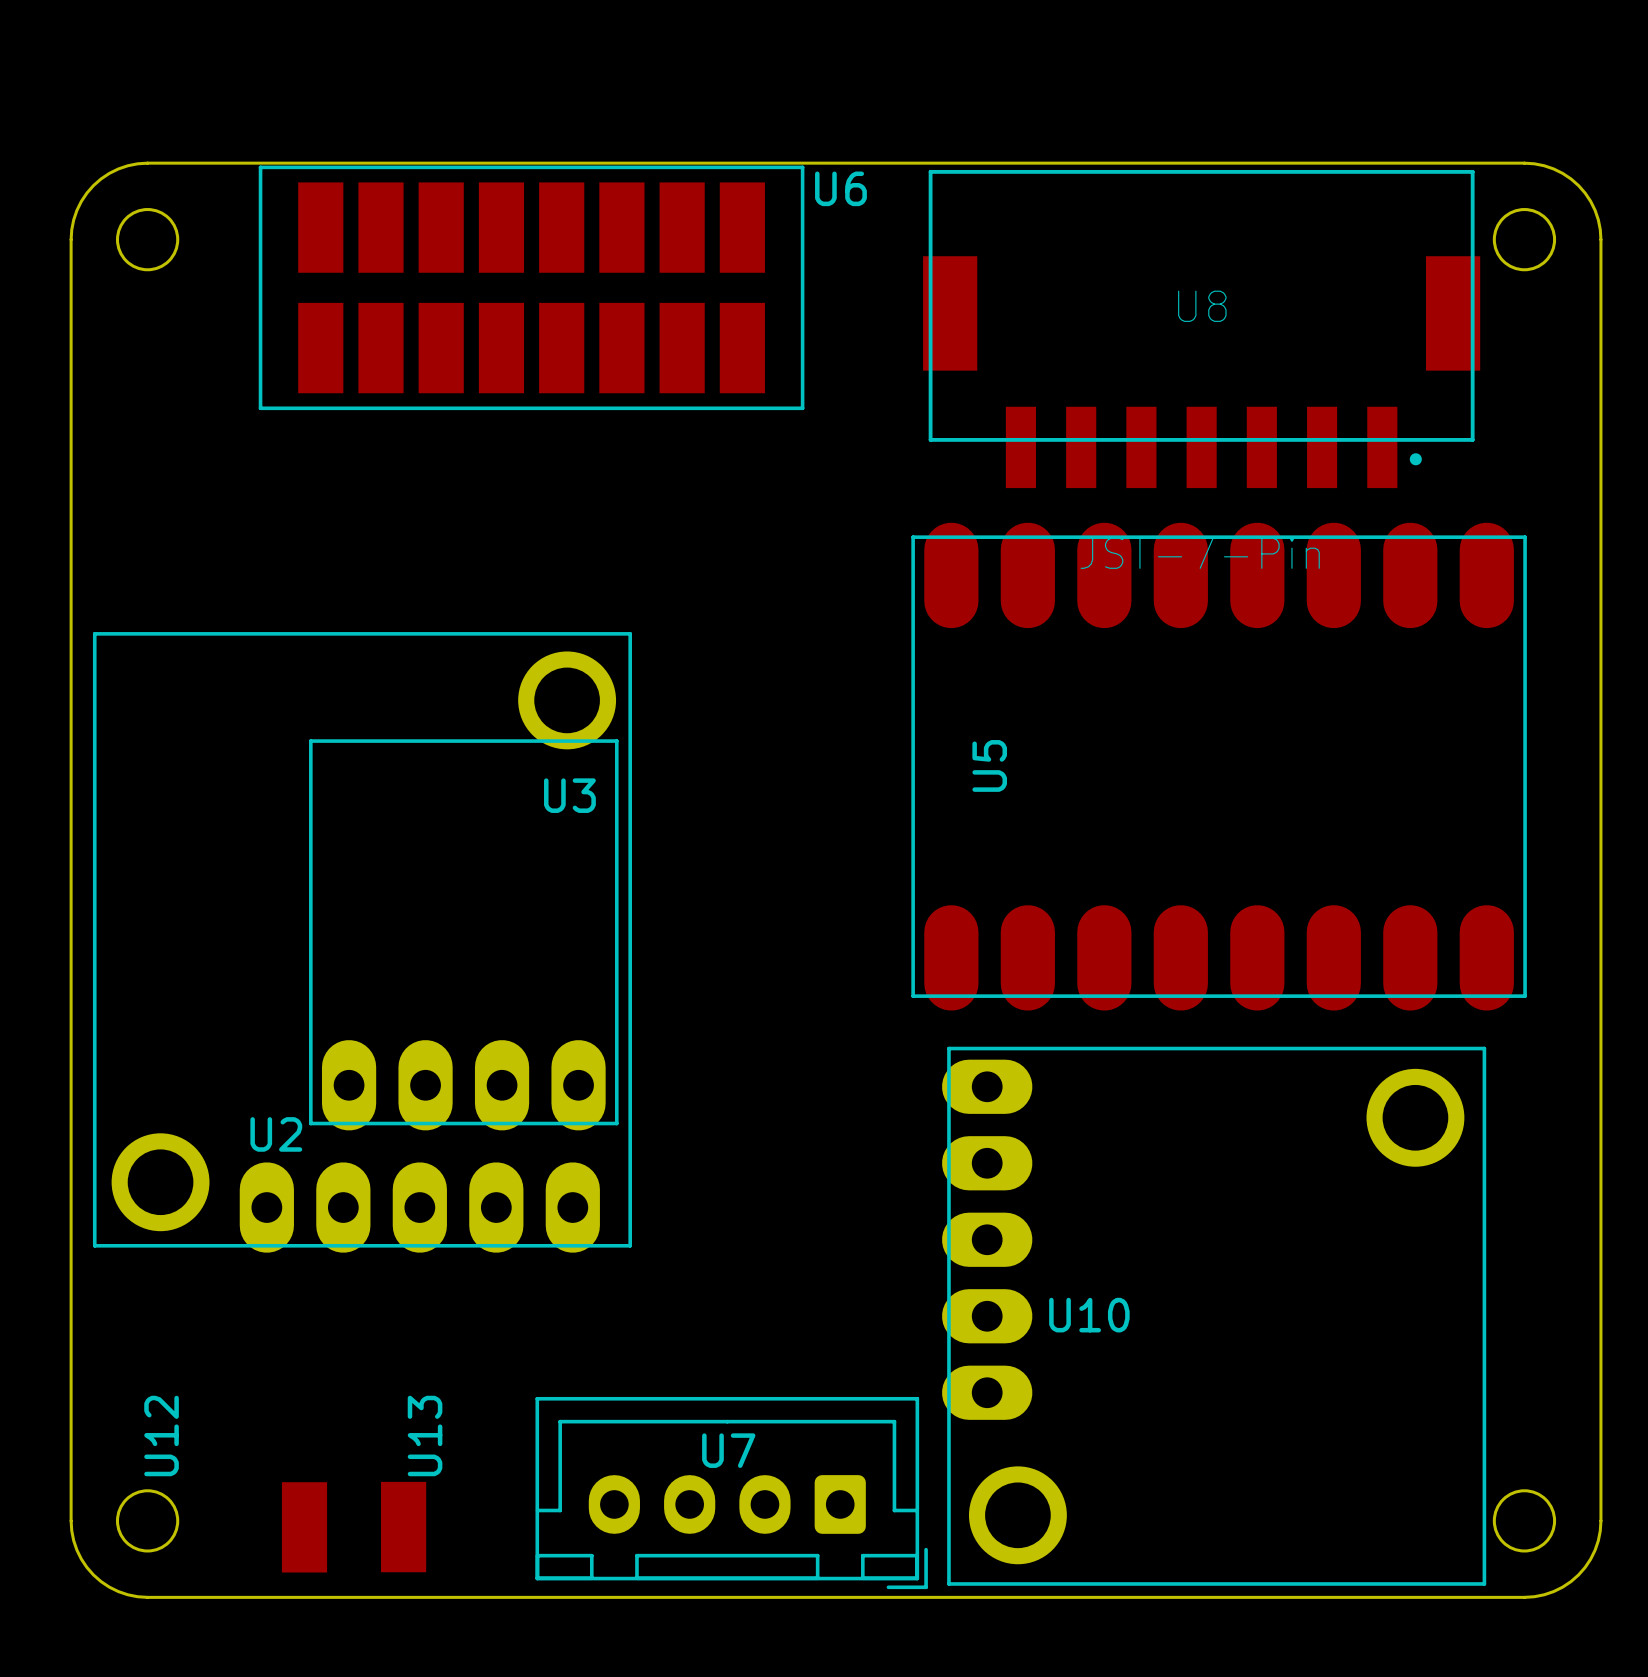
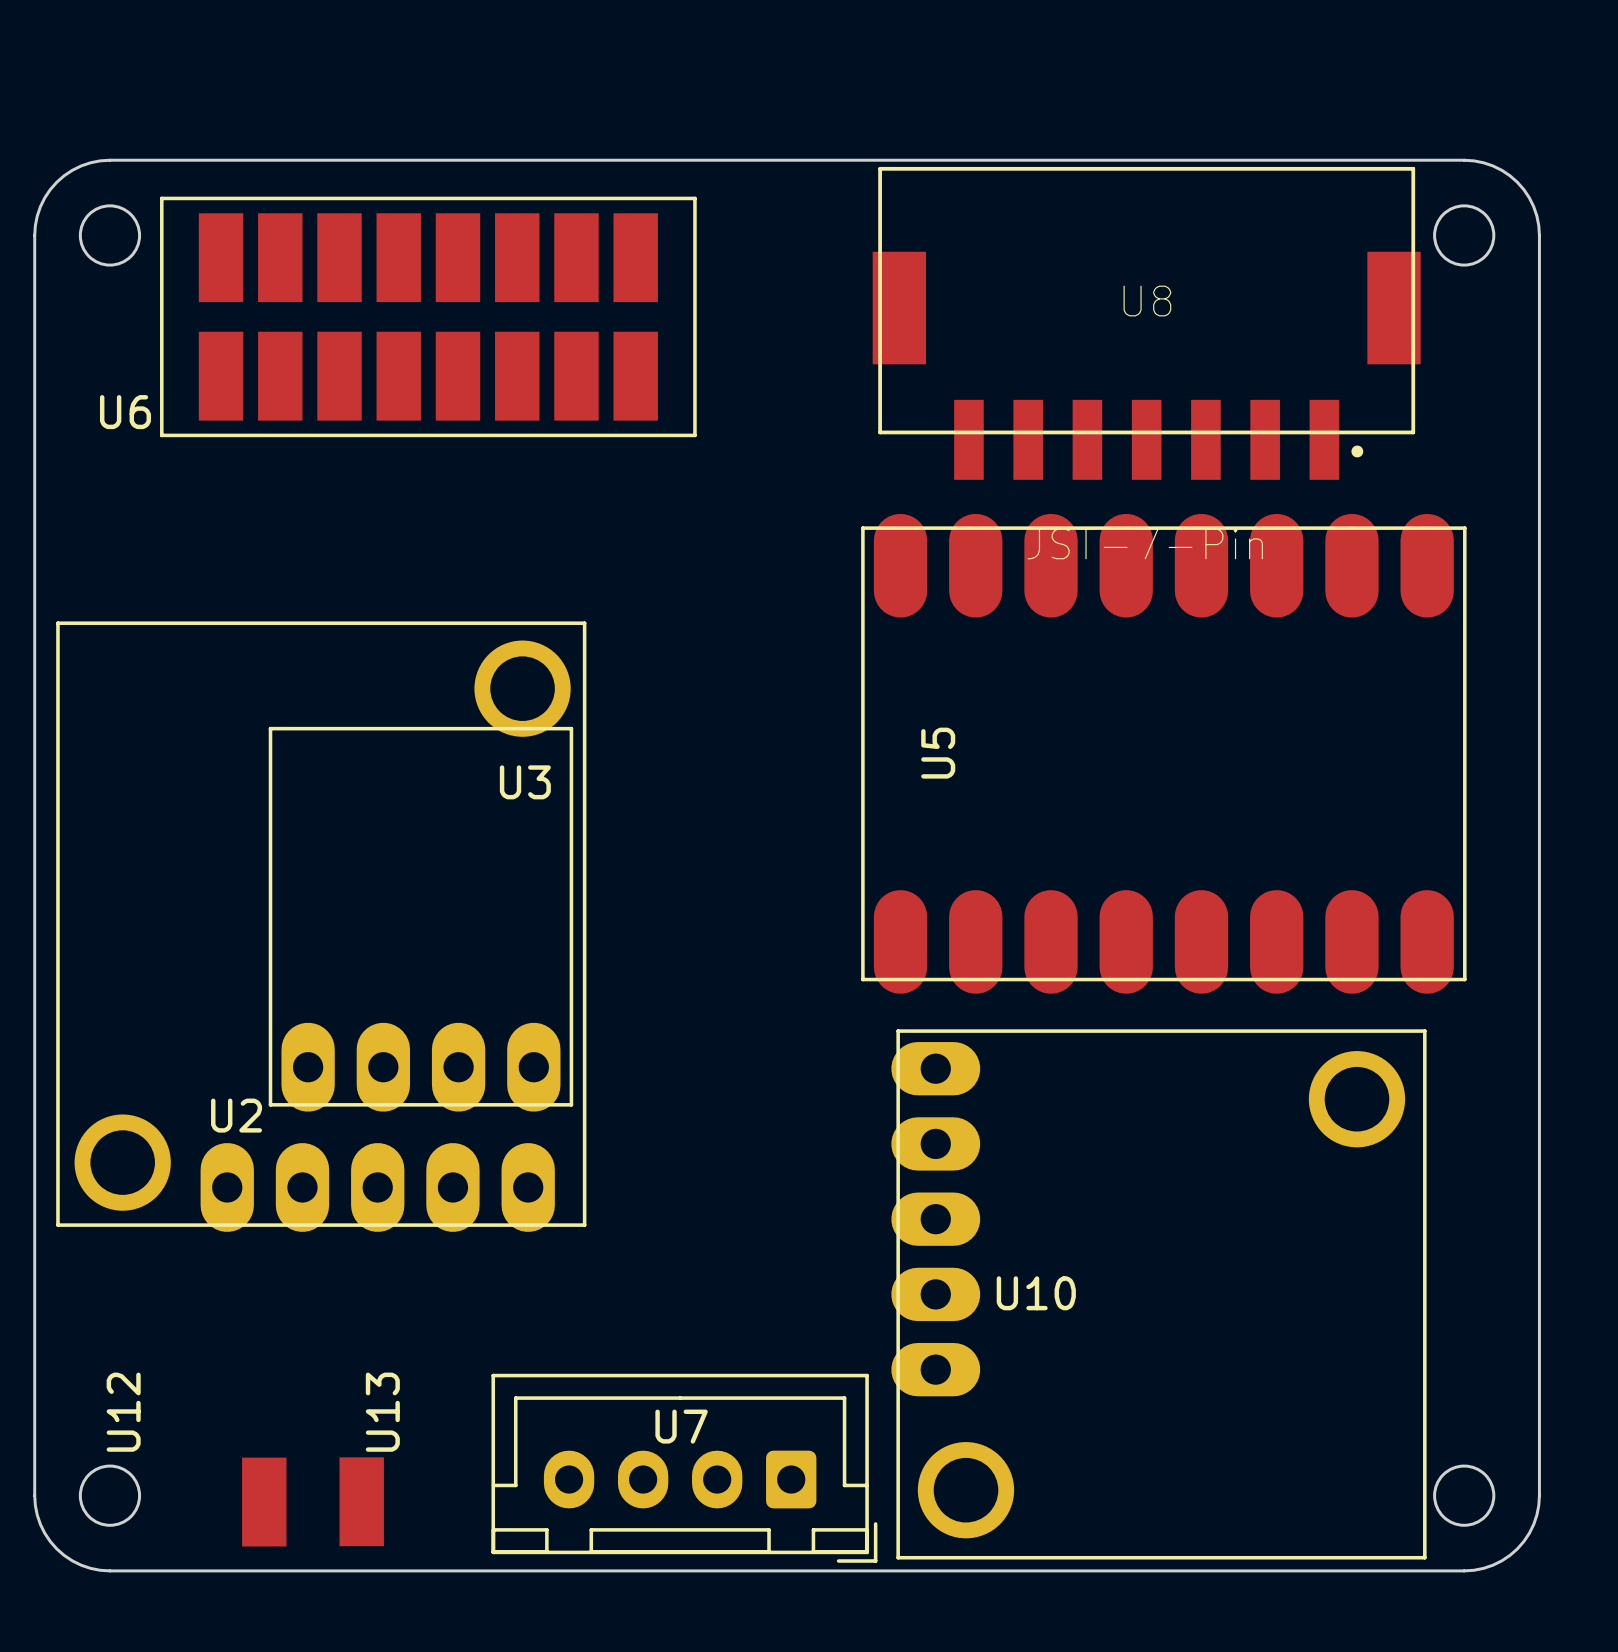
U6 name position: U6 (840, 188) -> U6 (125, 412)
U6 position: (531, 287) -> (428, 316)

